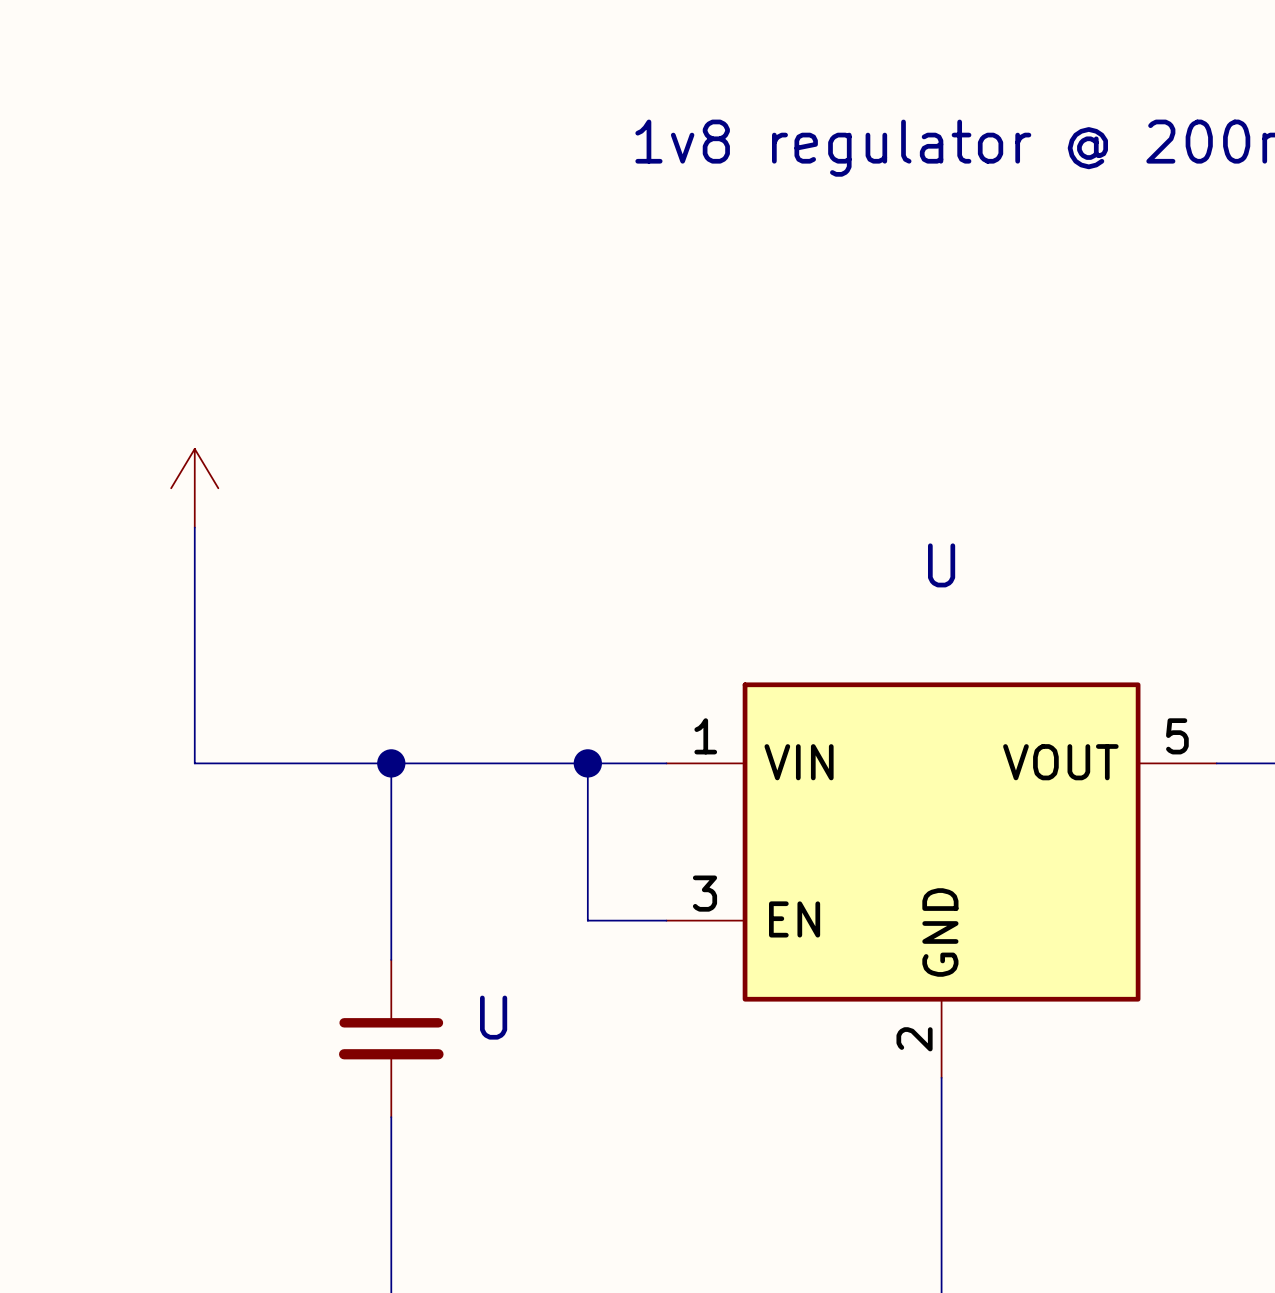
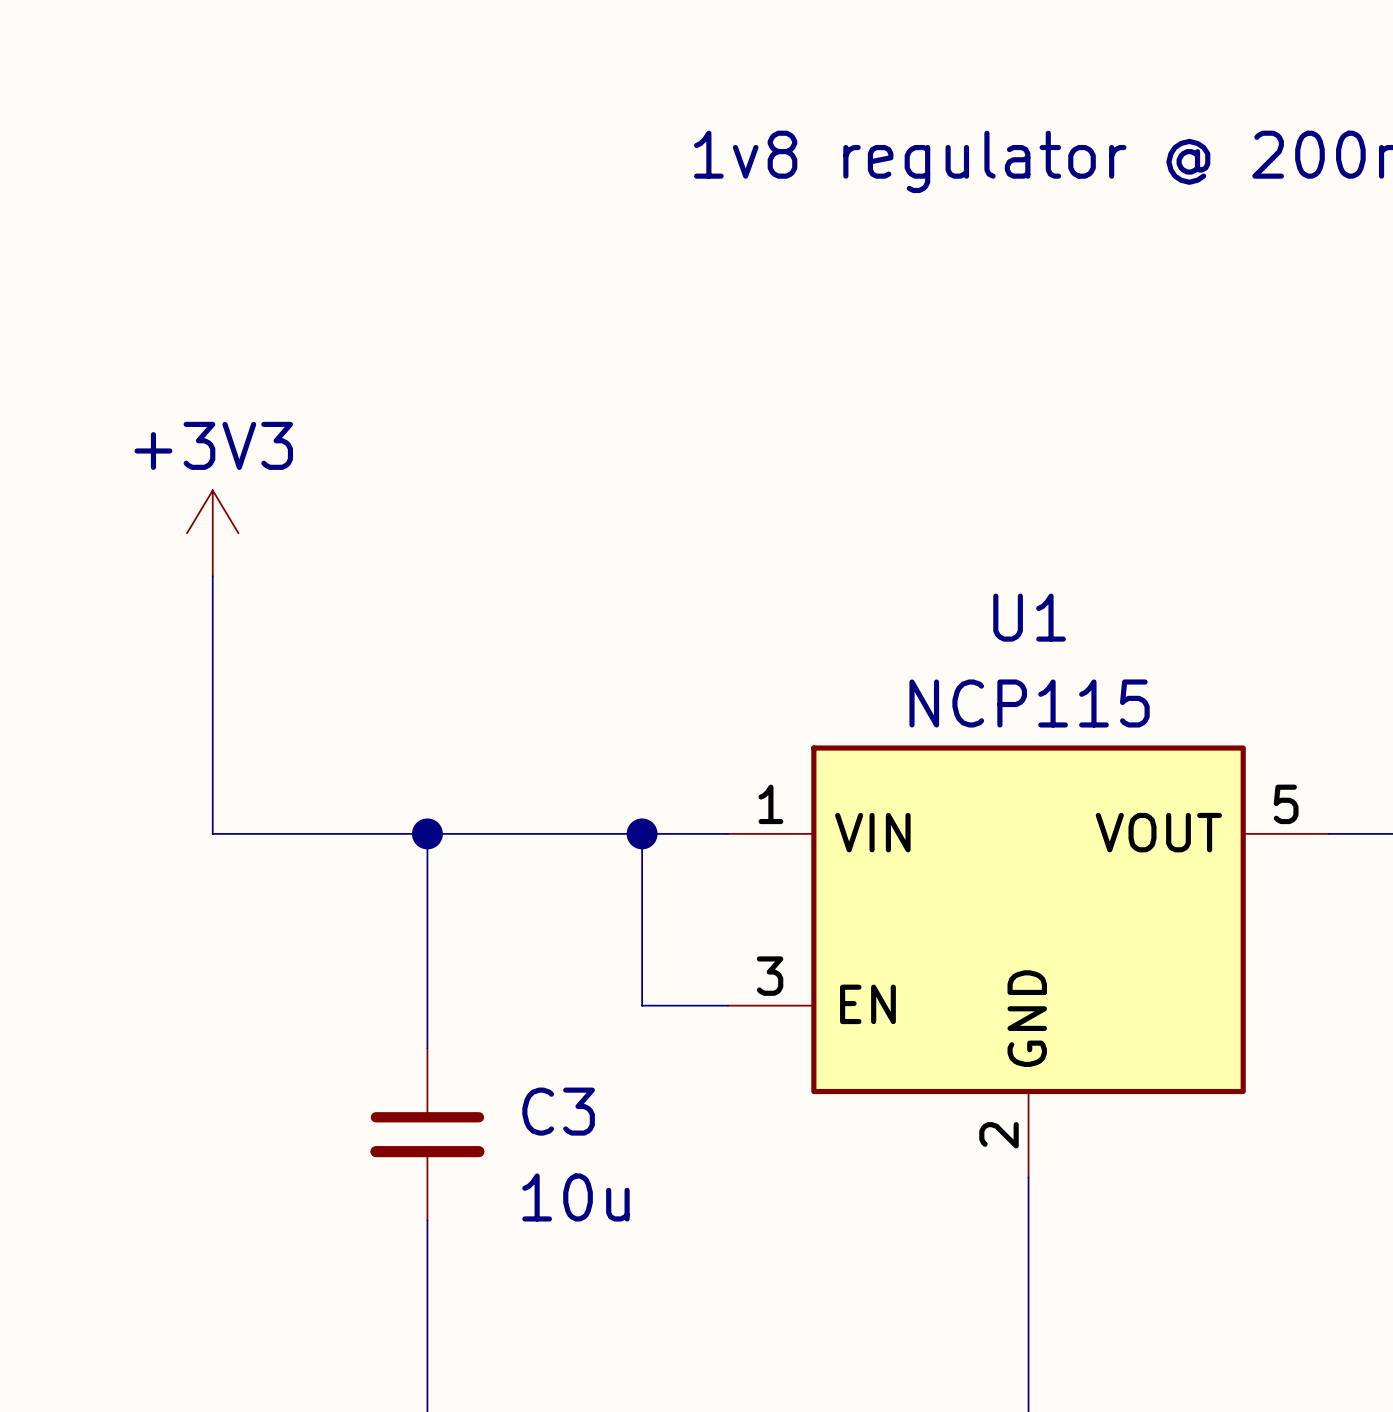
power symbol text: none -> +3V3 (213, 445)
U name: U (941, 565) -> U1 (1029, 617)
U value: none -> NCP115 (1029, 703)
U name: U (493, 1017) -> C3 (558, 1111)
U value: none -> 10u (575, 1197)

